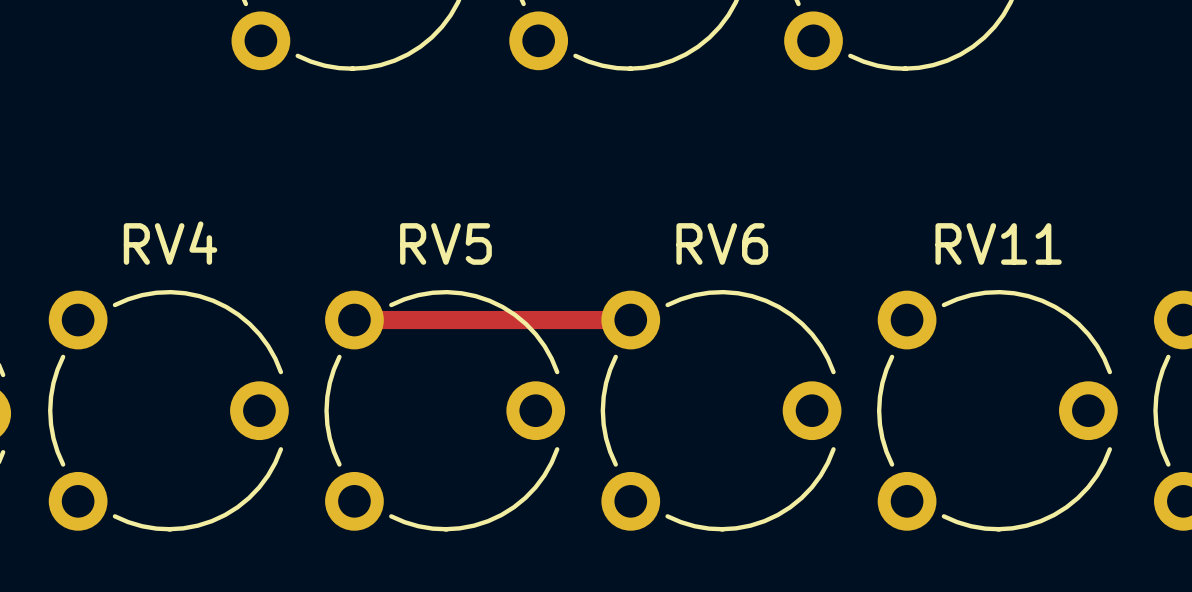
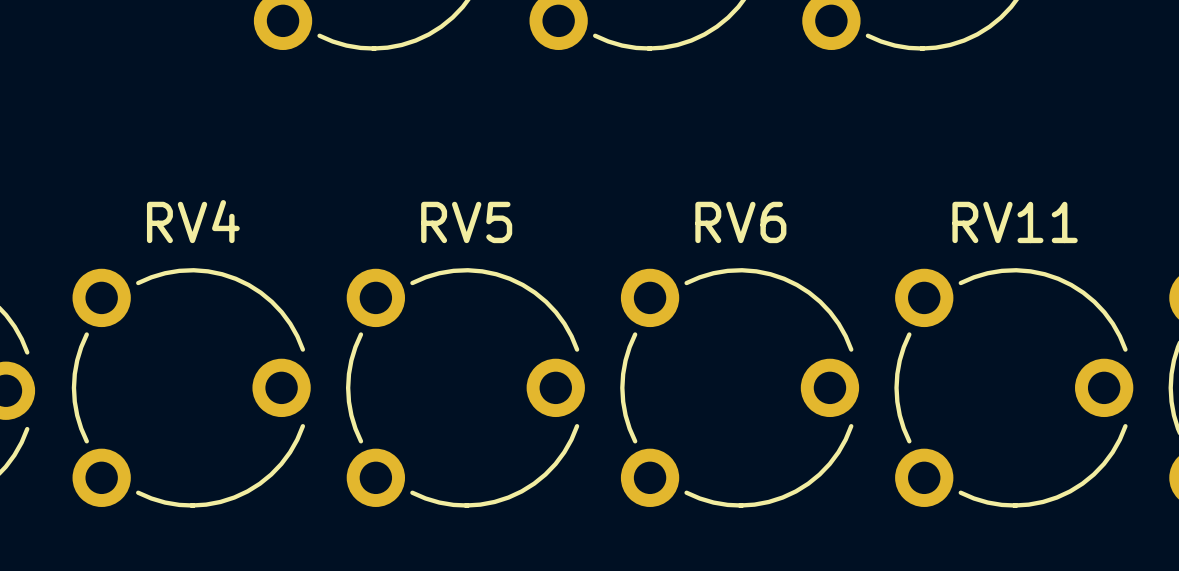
track: (354, 320) (630, 320) -> none

